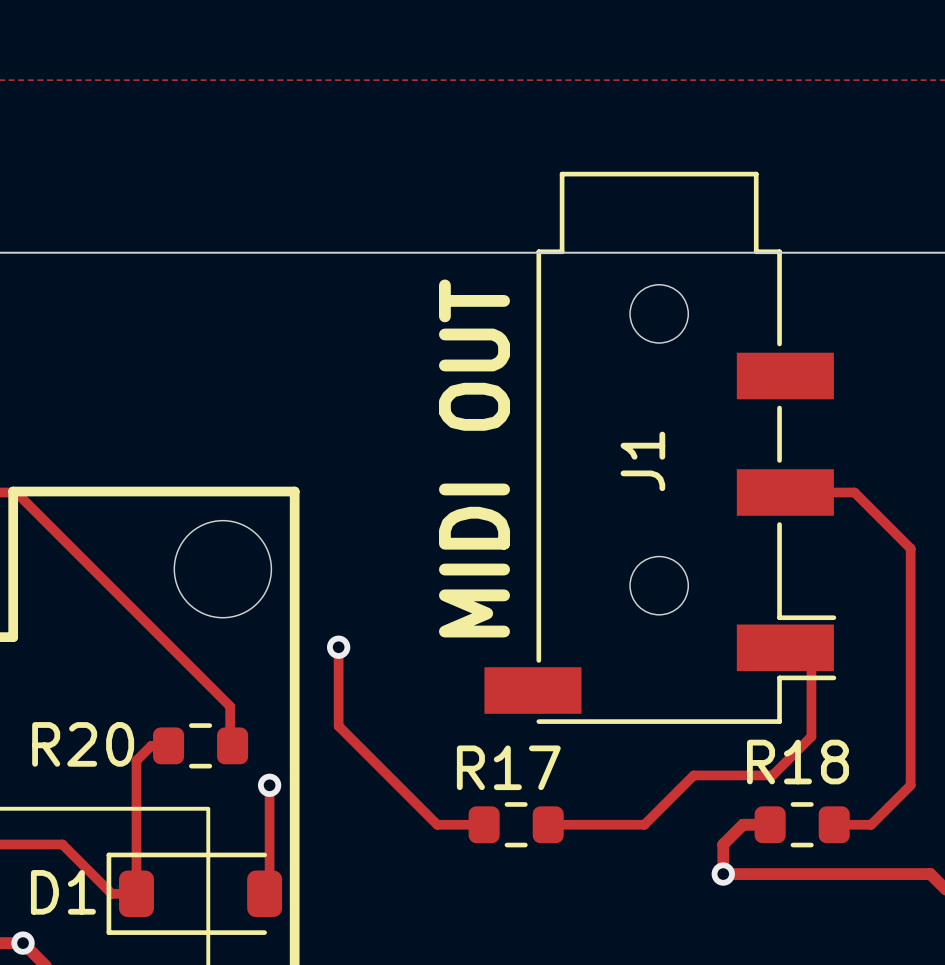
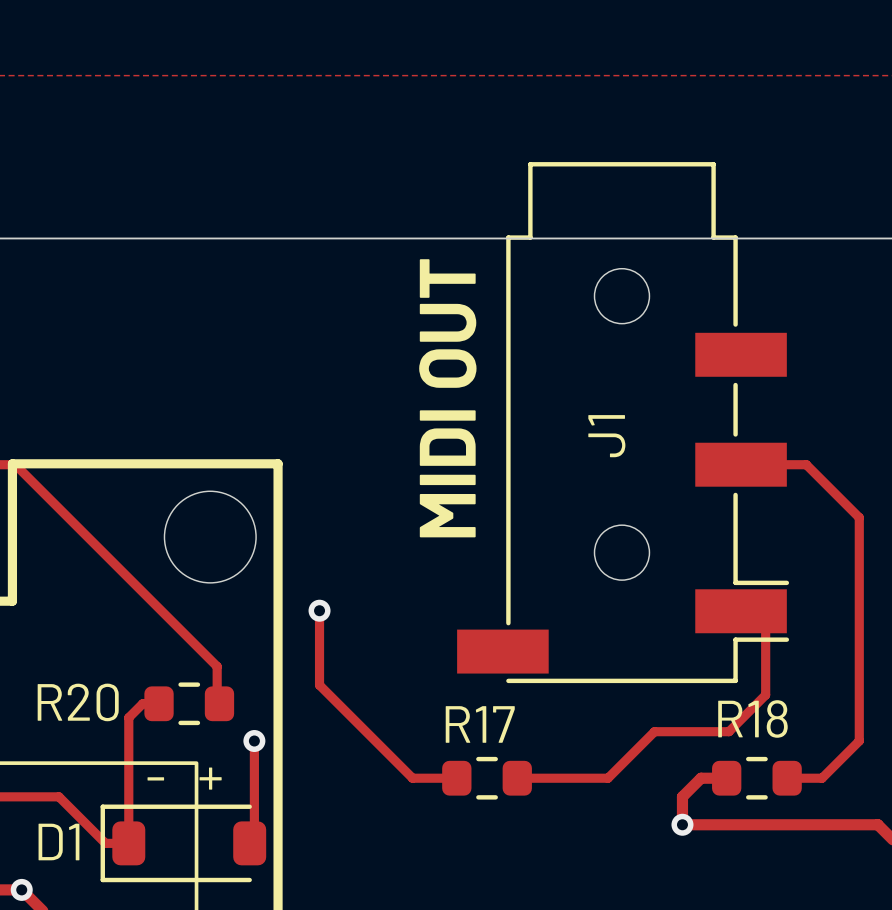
text: none -> - + (184, 778)

